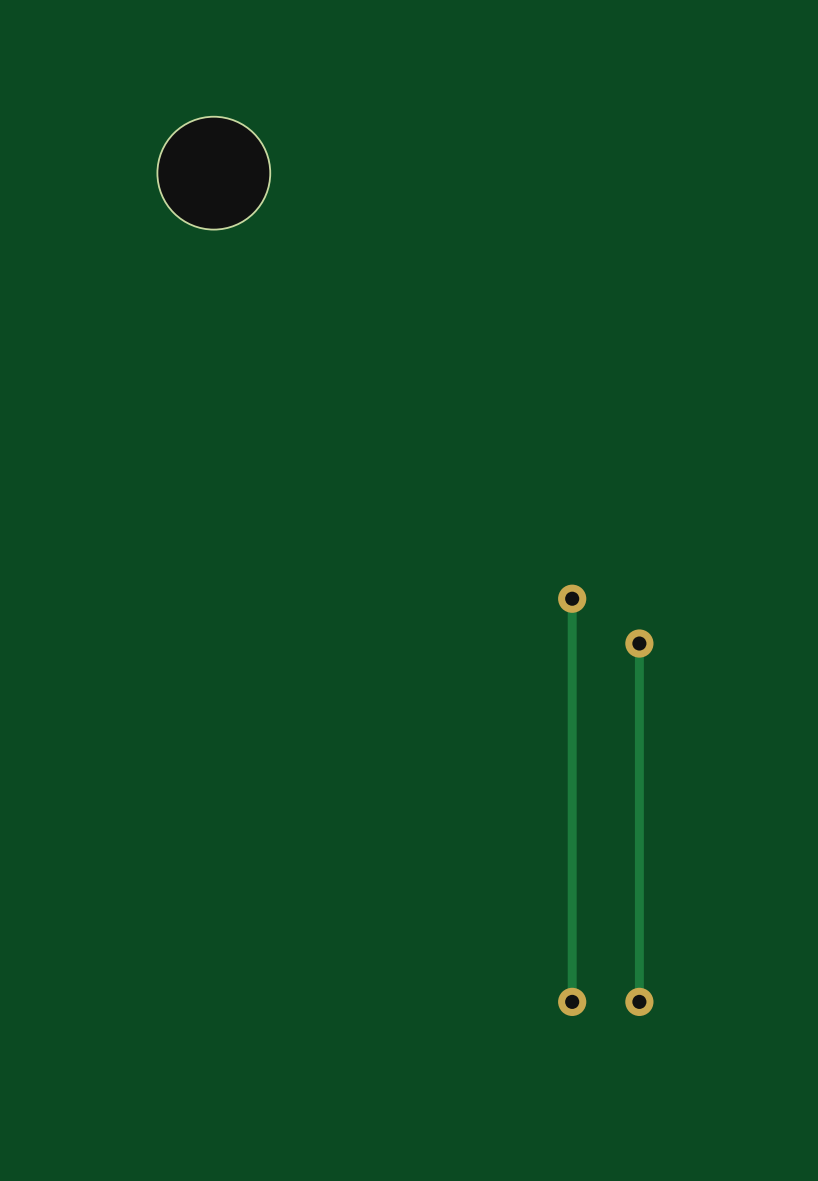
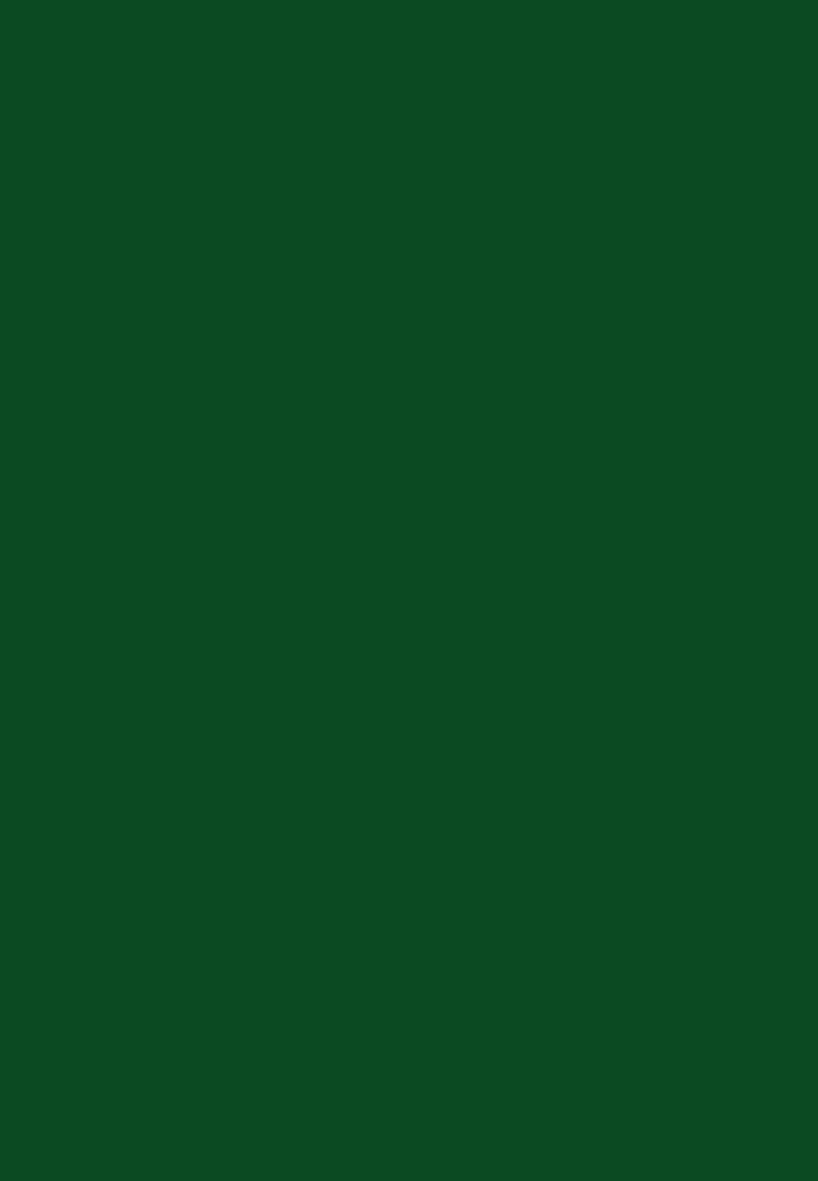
part: (213, 173) -> none
track: (572, 598) (572, 1001) -> none
via: (572, 598) -> none
track: (639, 643) (639, 1001) -> none
via: (639, 643) -> none
via: (572, 1001) -> none
via: (639, 1001) -> none

